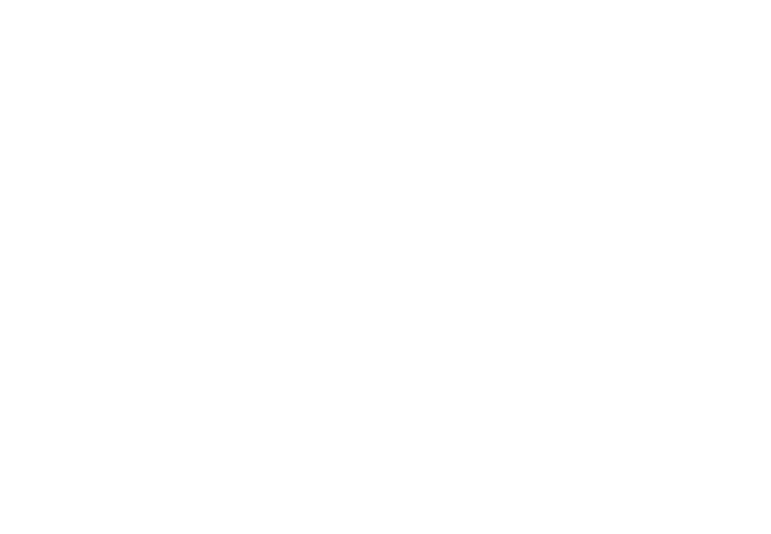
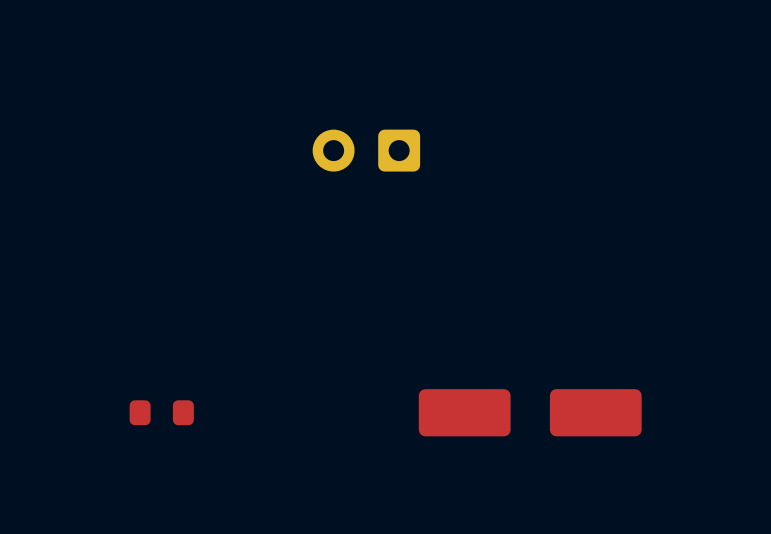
part: none -> (366, 150)
part: none -> (161, 412)
part: none -> (530, 412)

